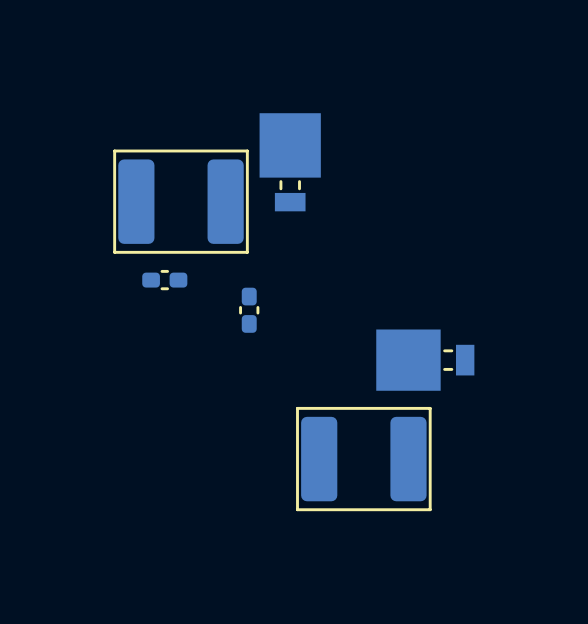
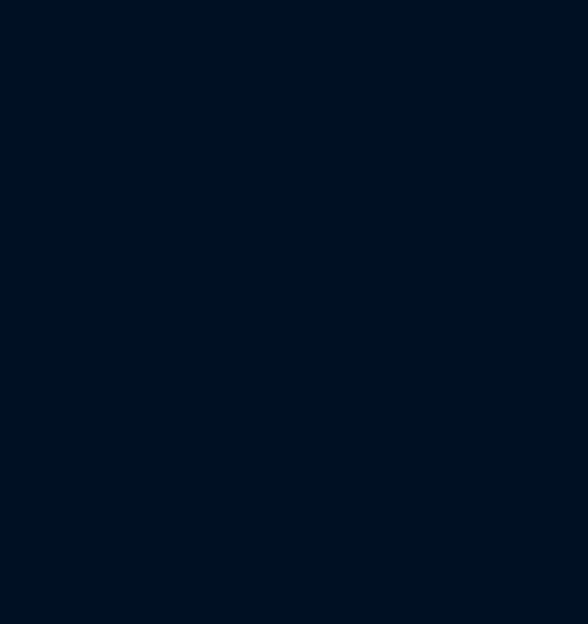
part: (290, 162) -> none
part: (181, 201) -> none
part: (164, 280) -> none
part: (249, 310) -> none
part: (425, 360) -> none
part: (363, 459) -> none

